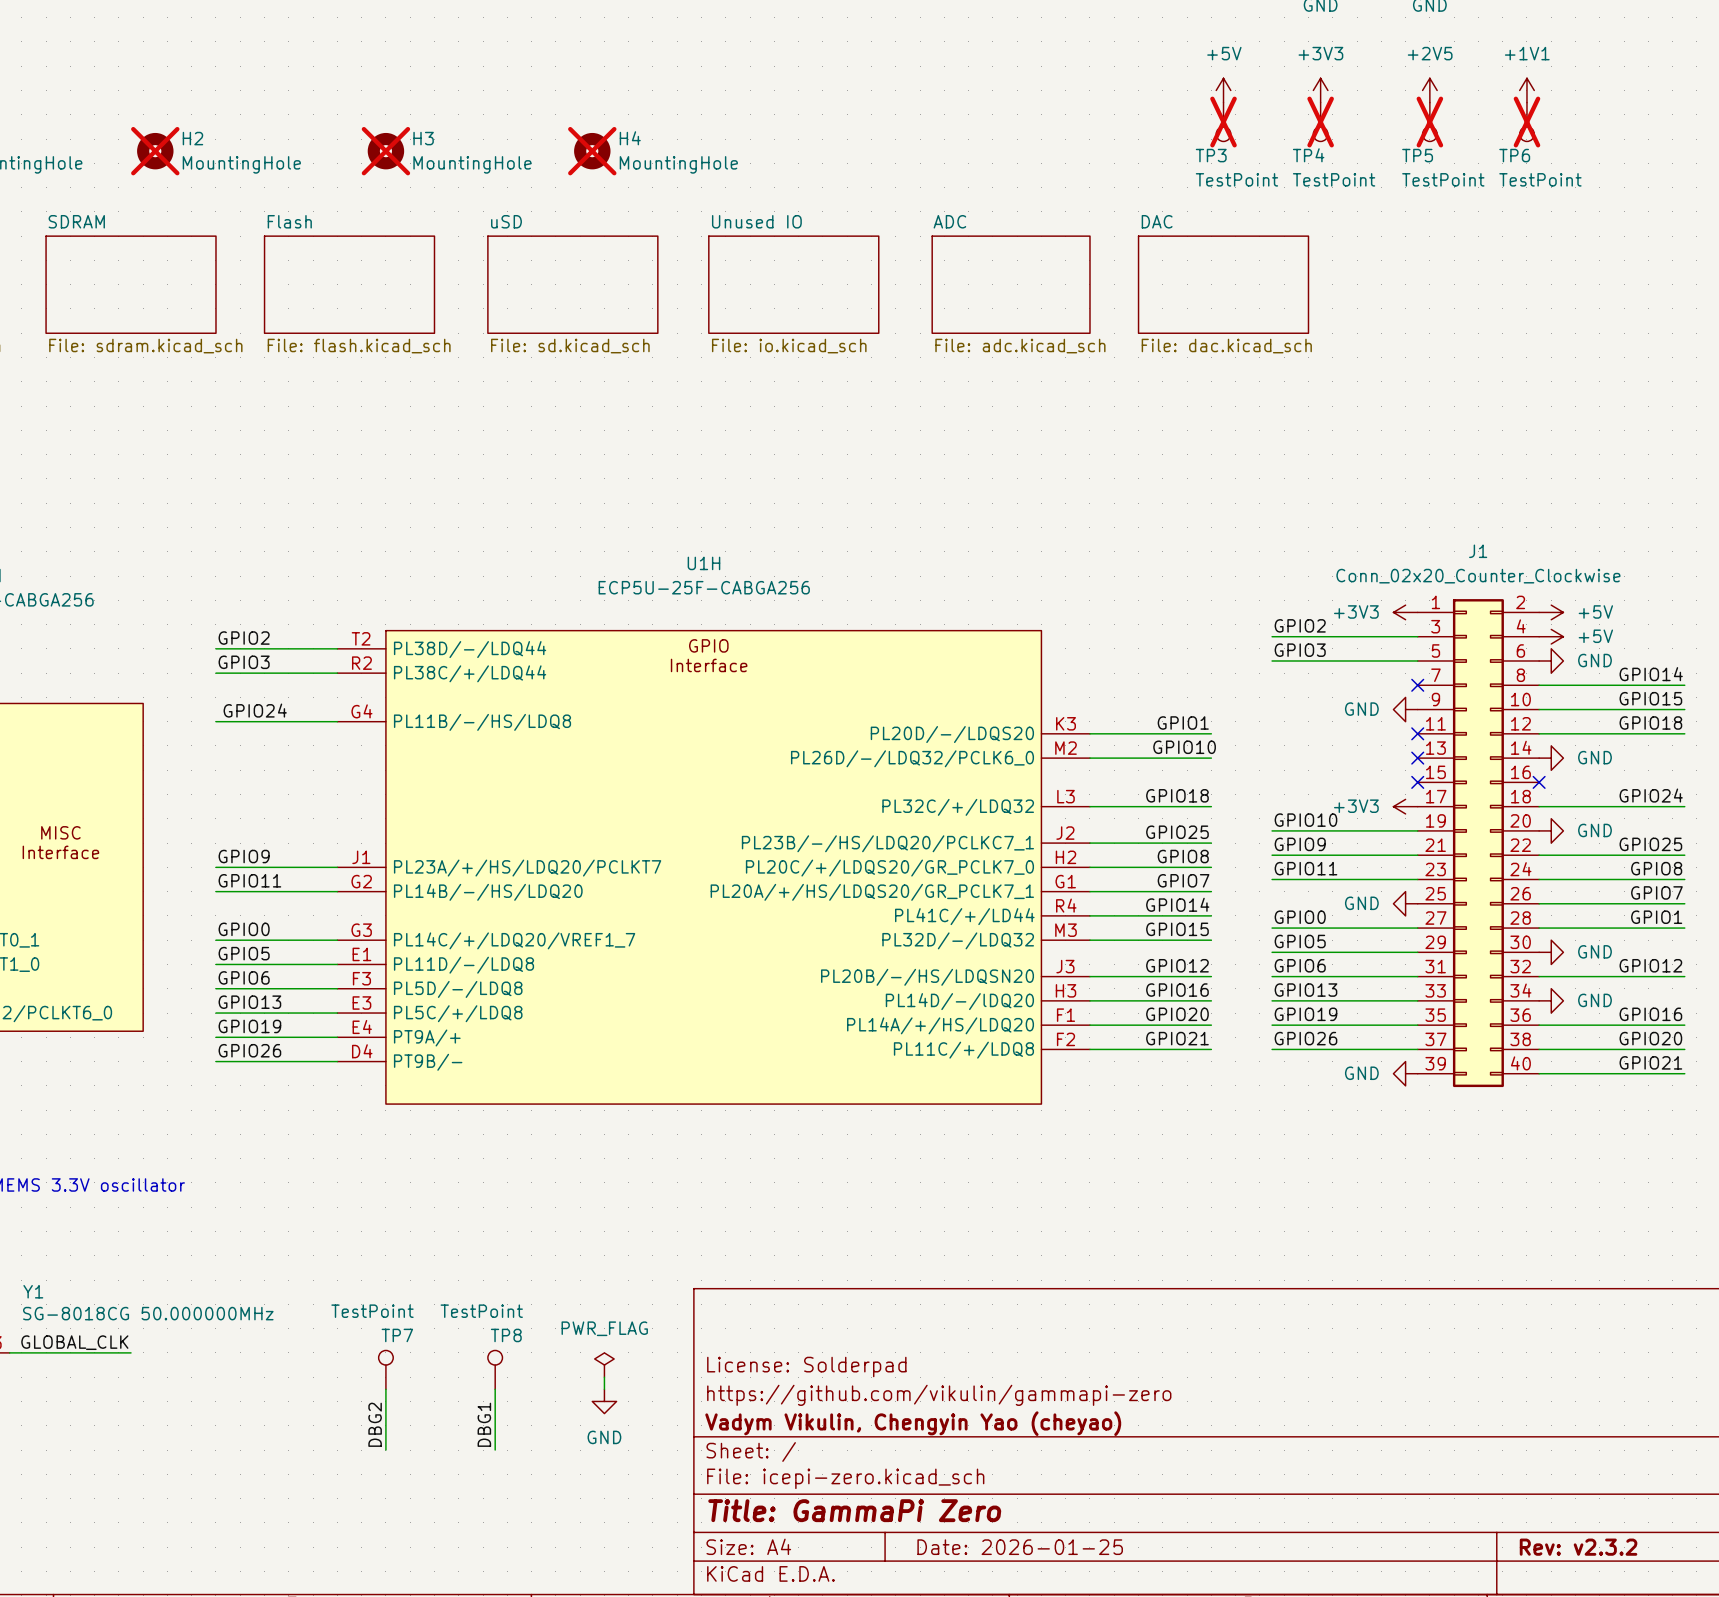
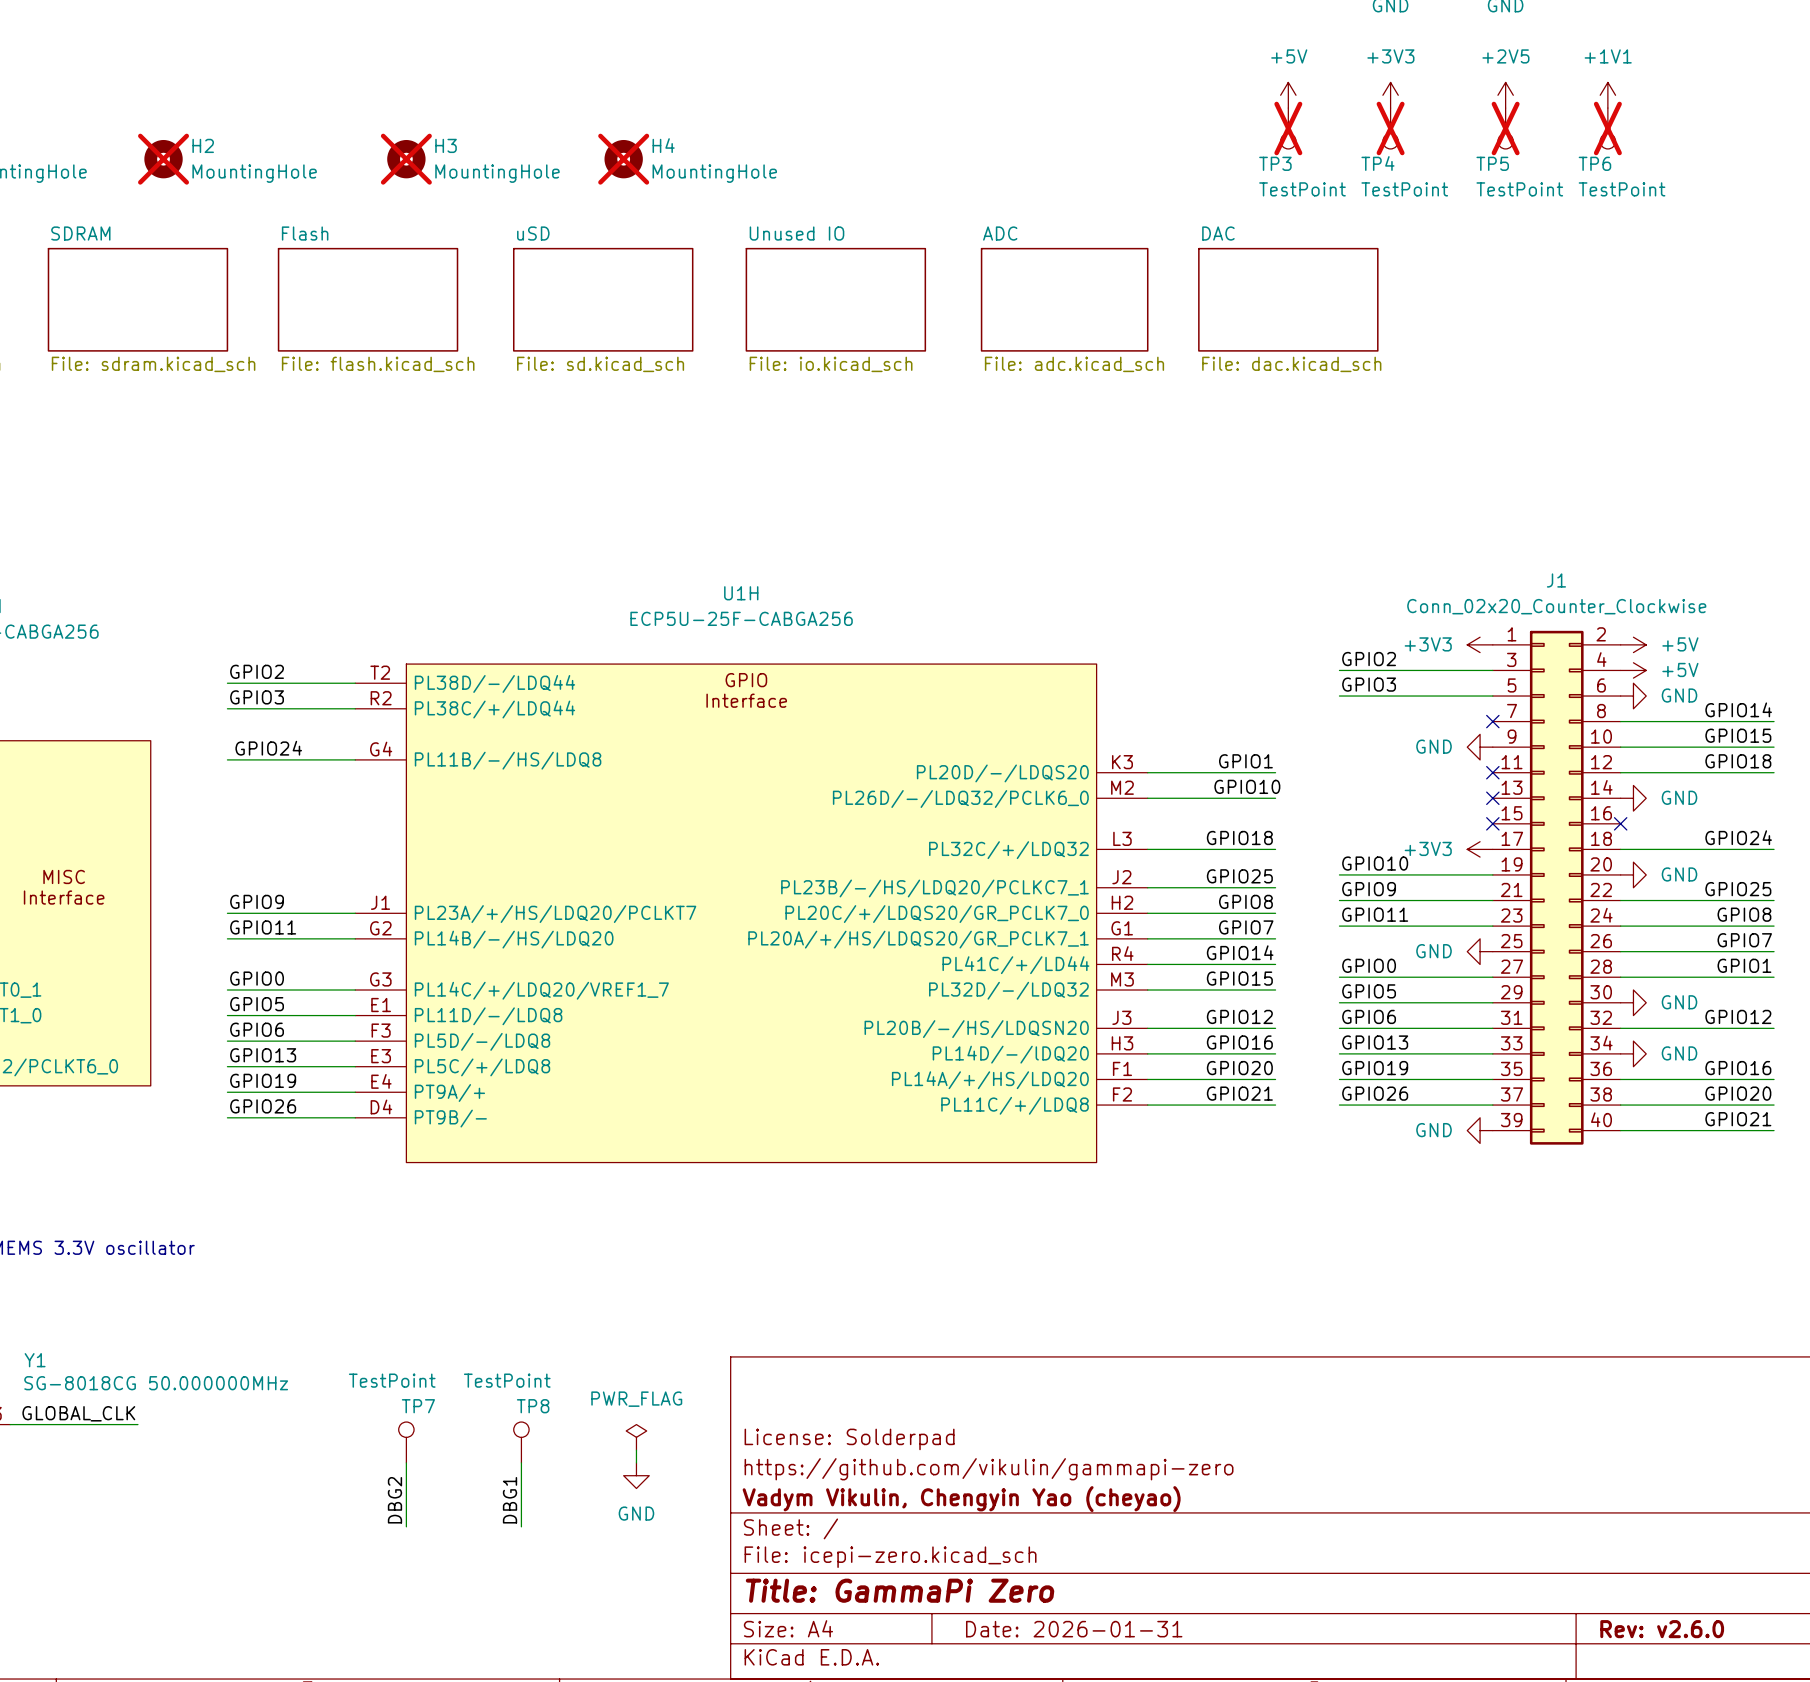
title block: Date: 2026-01-25 (1020, 1547) -> Date: 2026-01-31 (1074, 1629)
title block: Rev: v2.3.2 (1578, 1547) -> Rev: v2.6.0 (1662, 1629)

